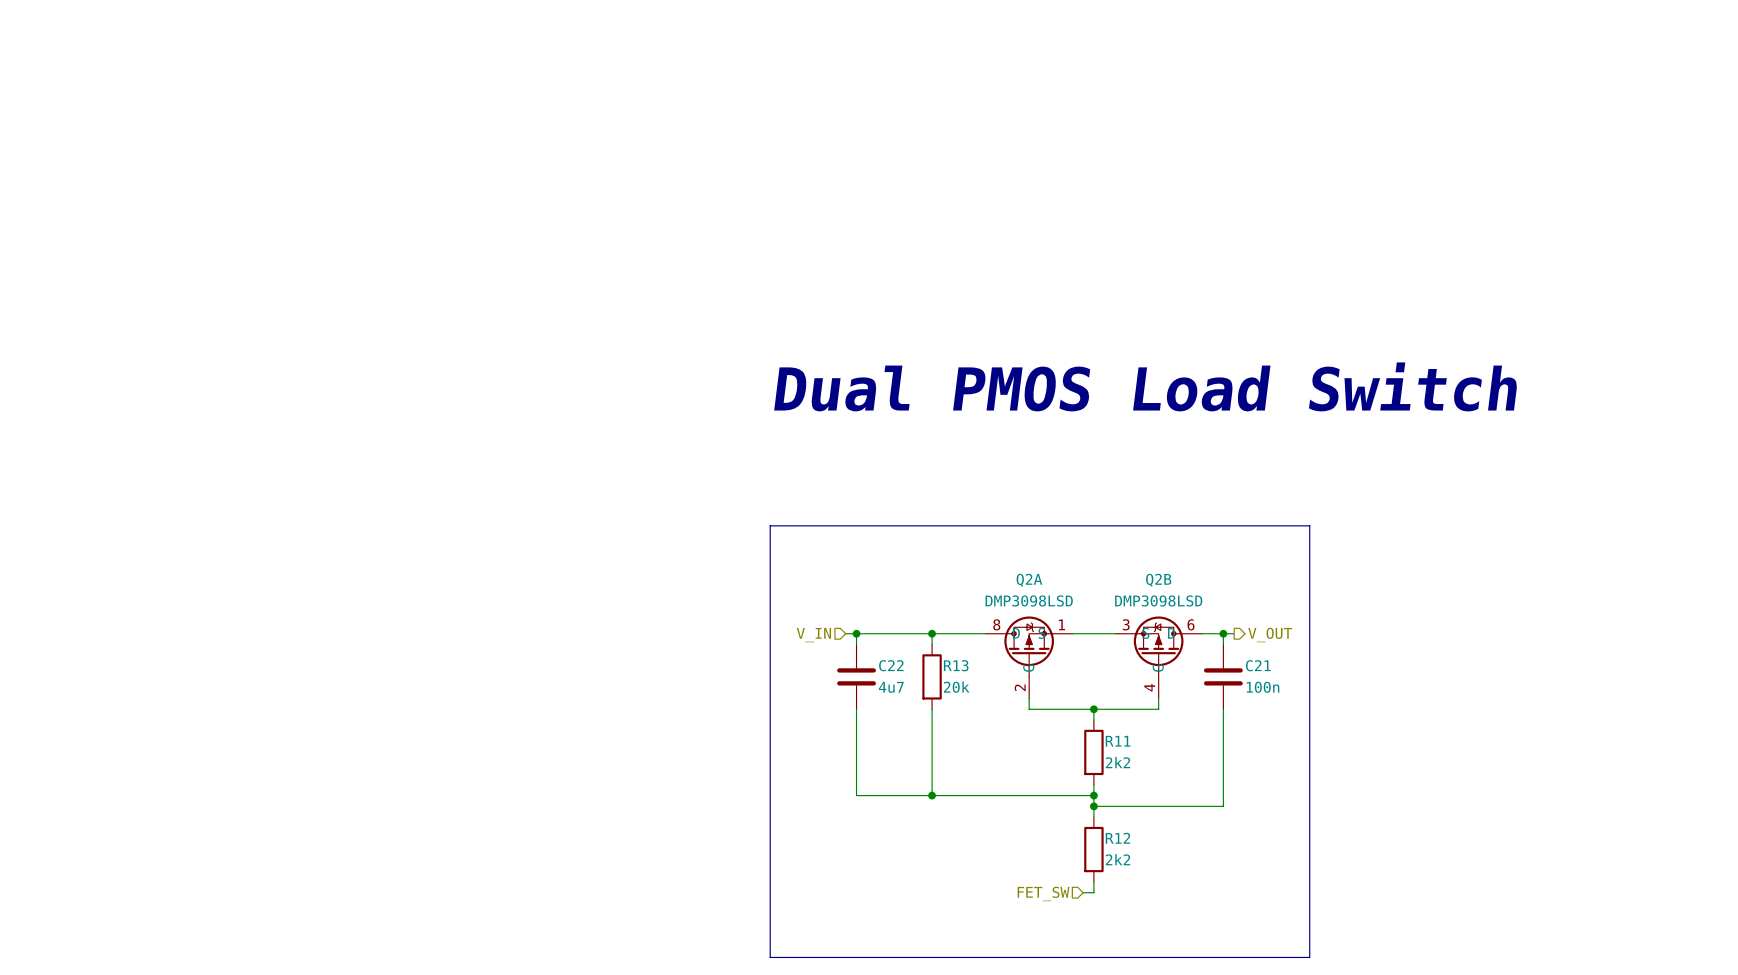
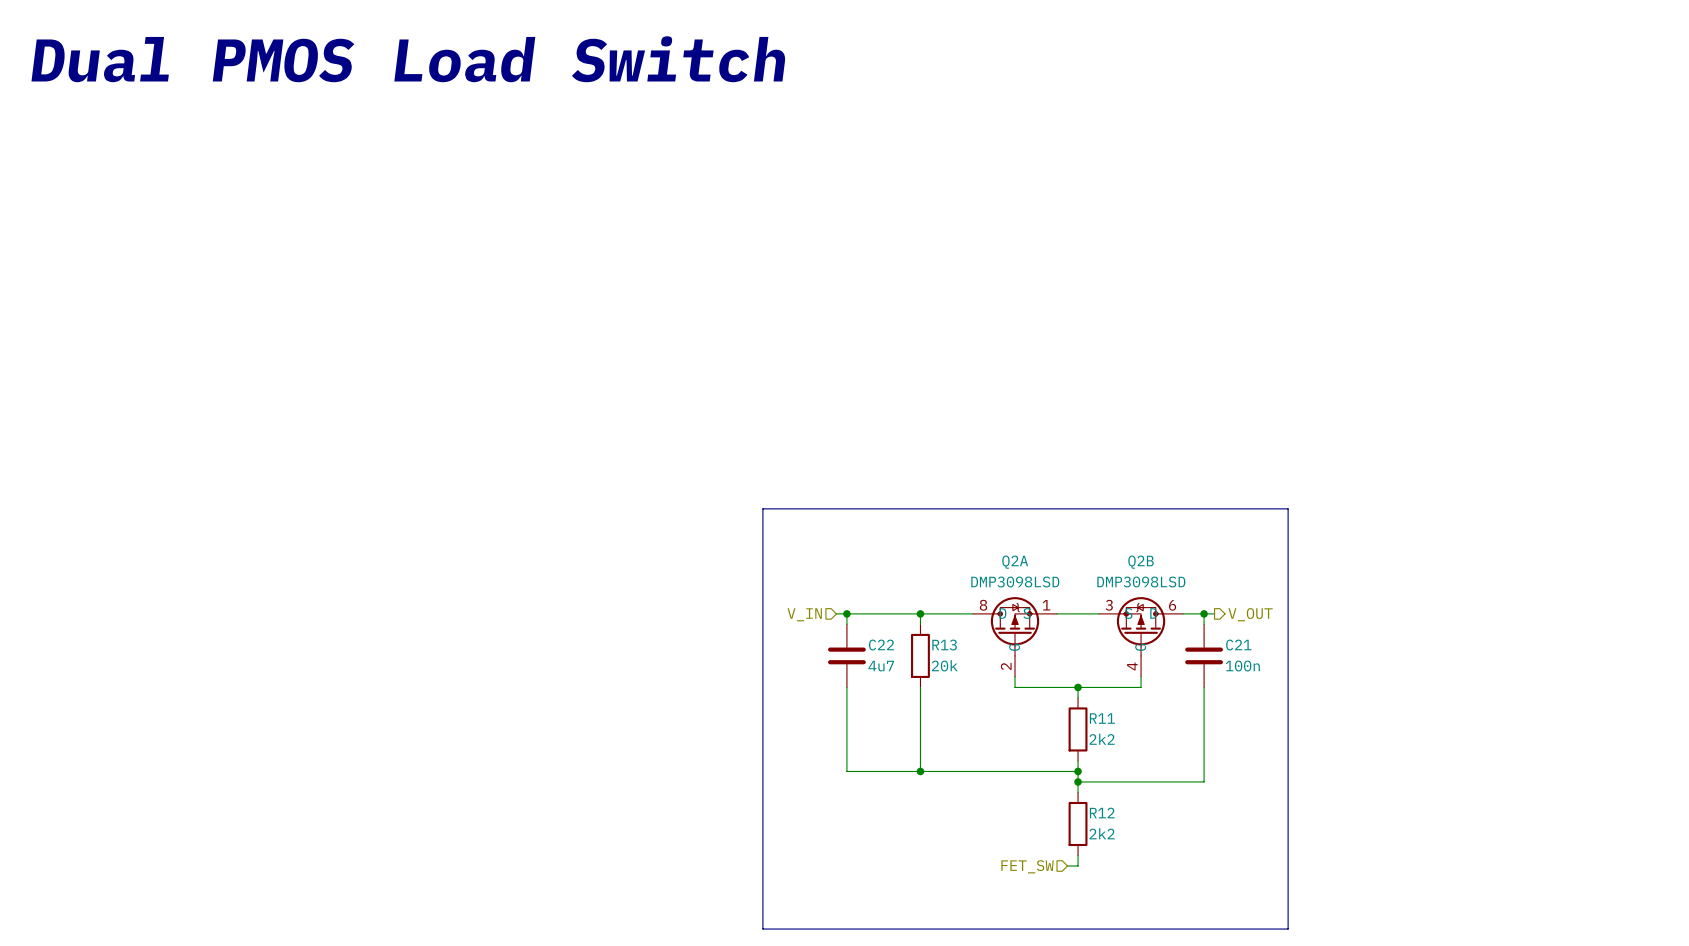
text: none -> Dual PMOS Load Switch (408, 59)
text: Dual PMOS Load Switch (1145, 386) -> none

